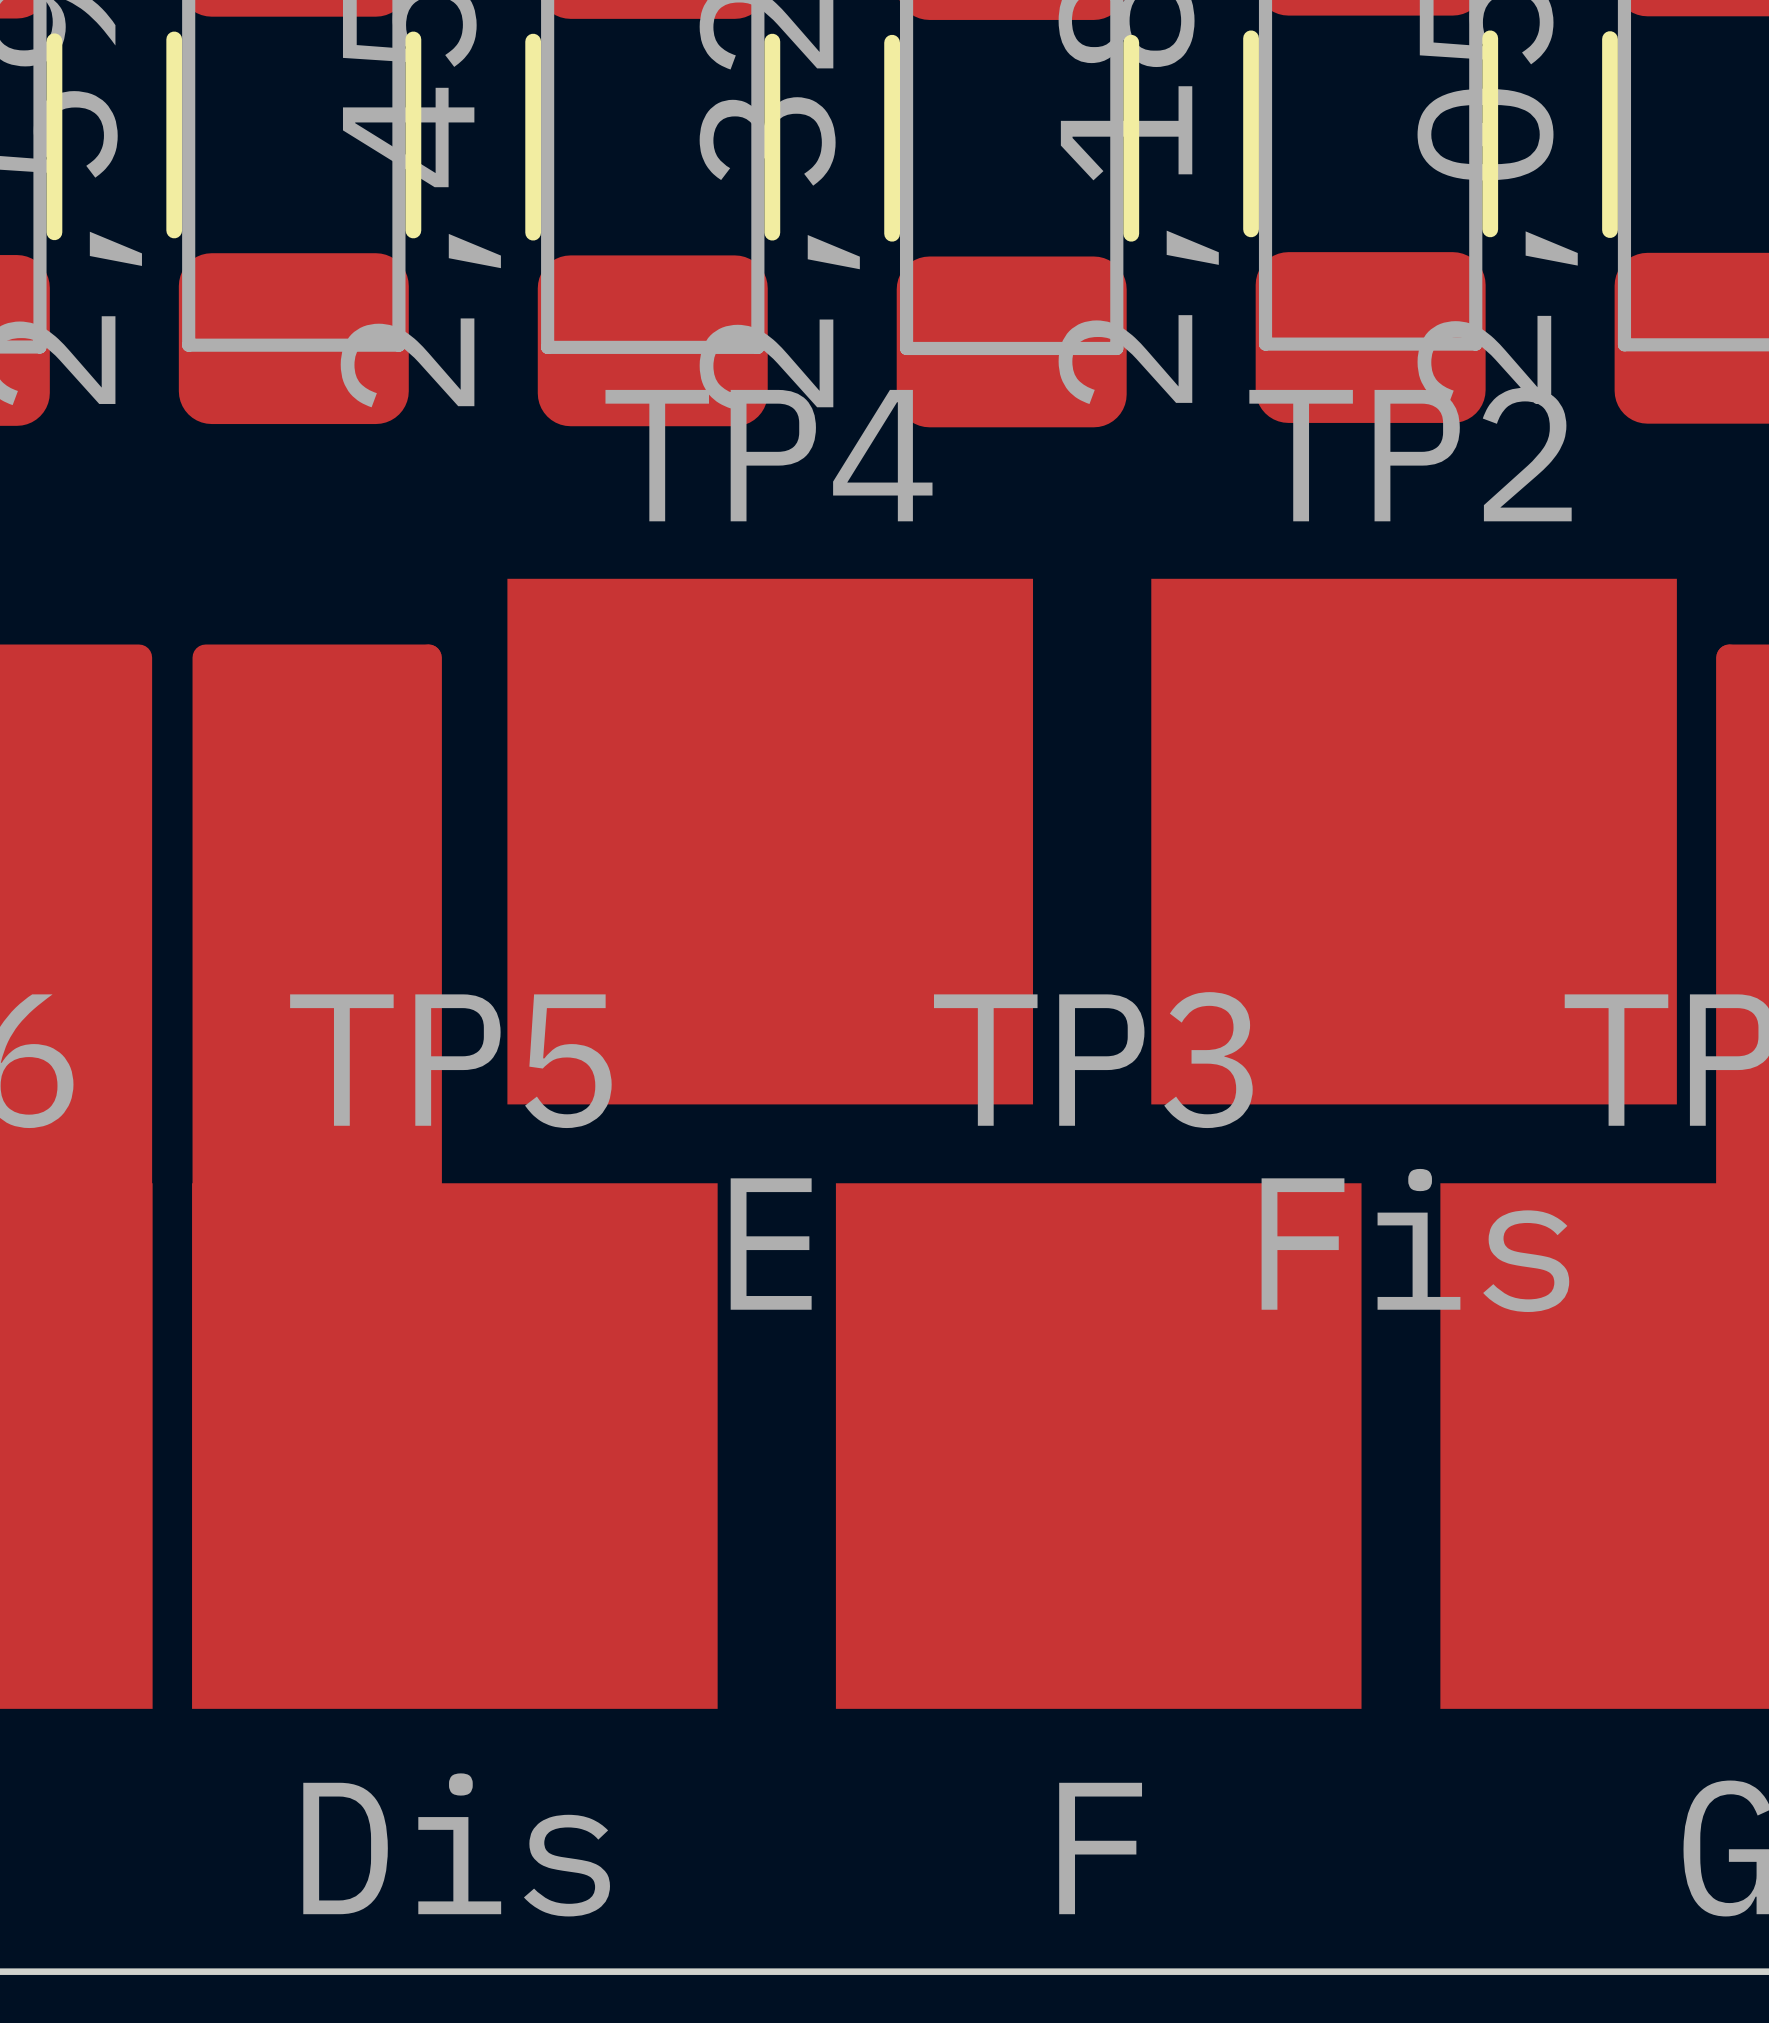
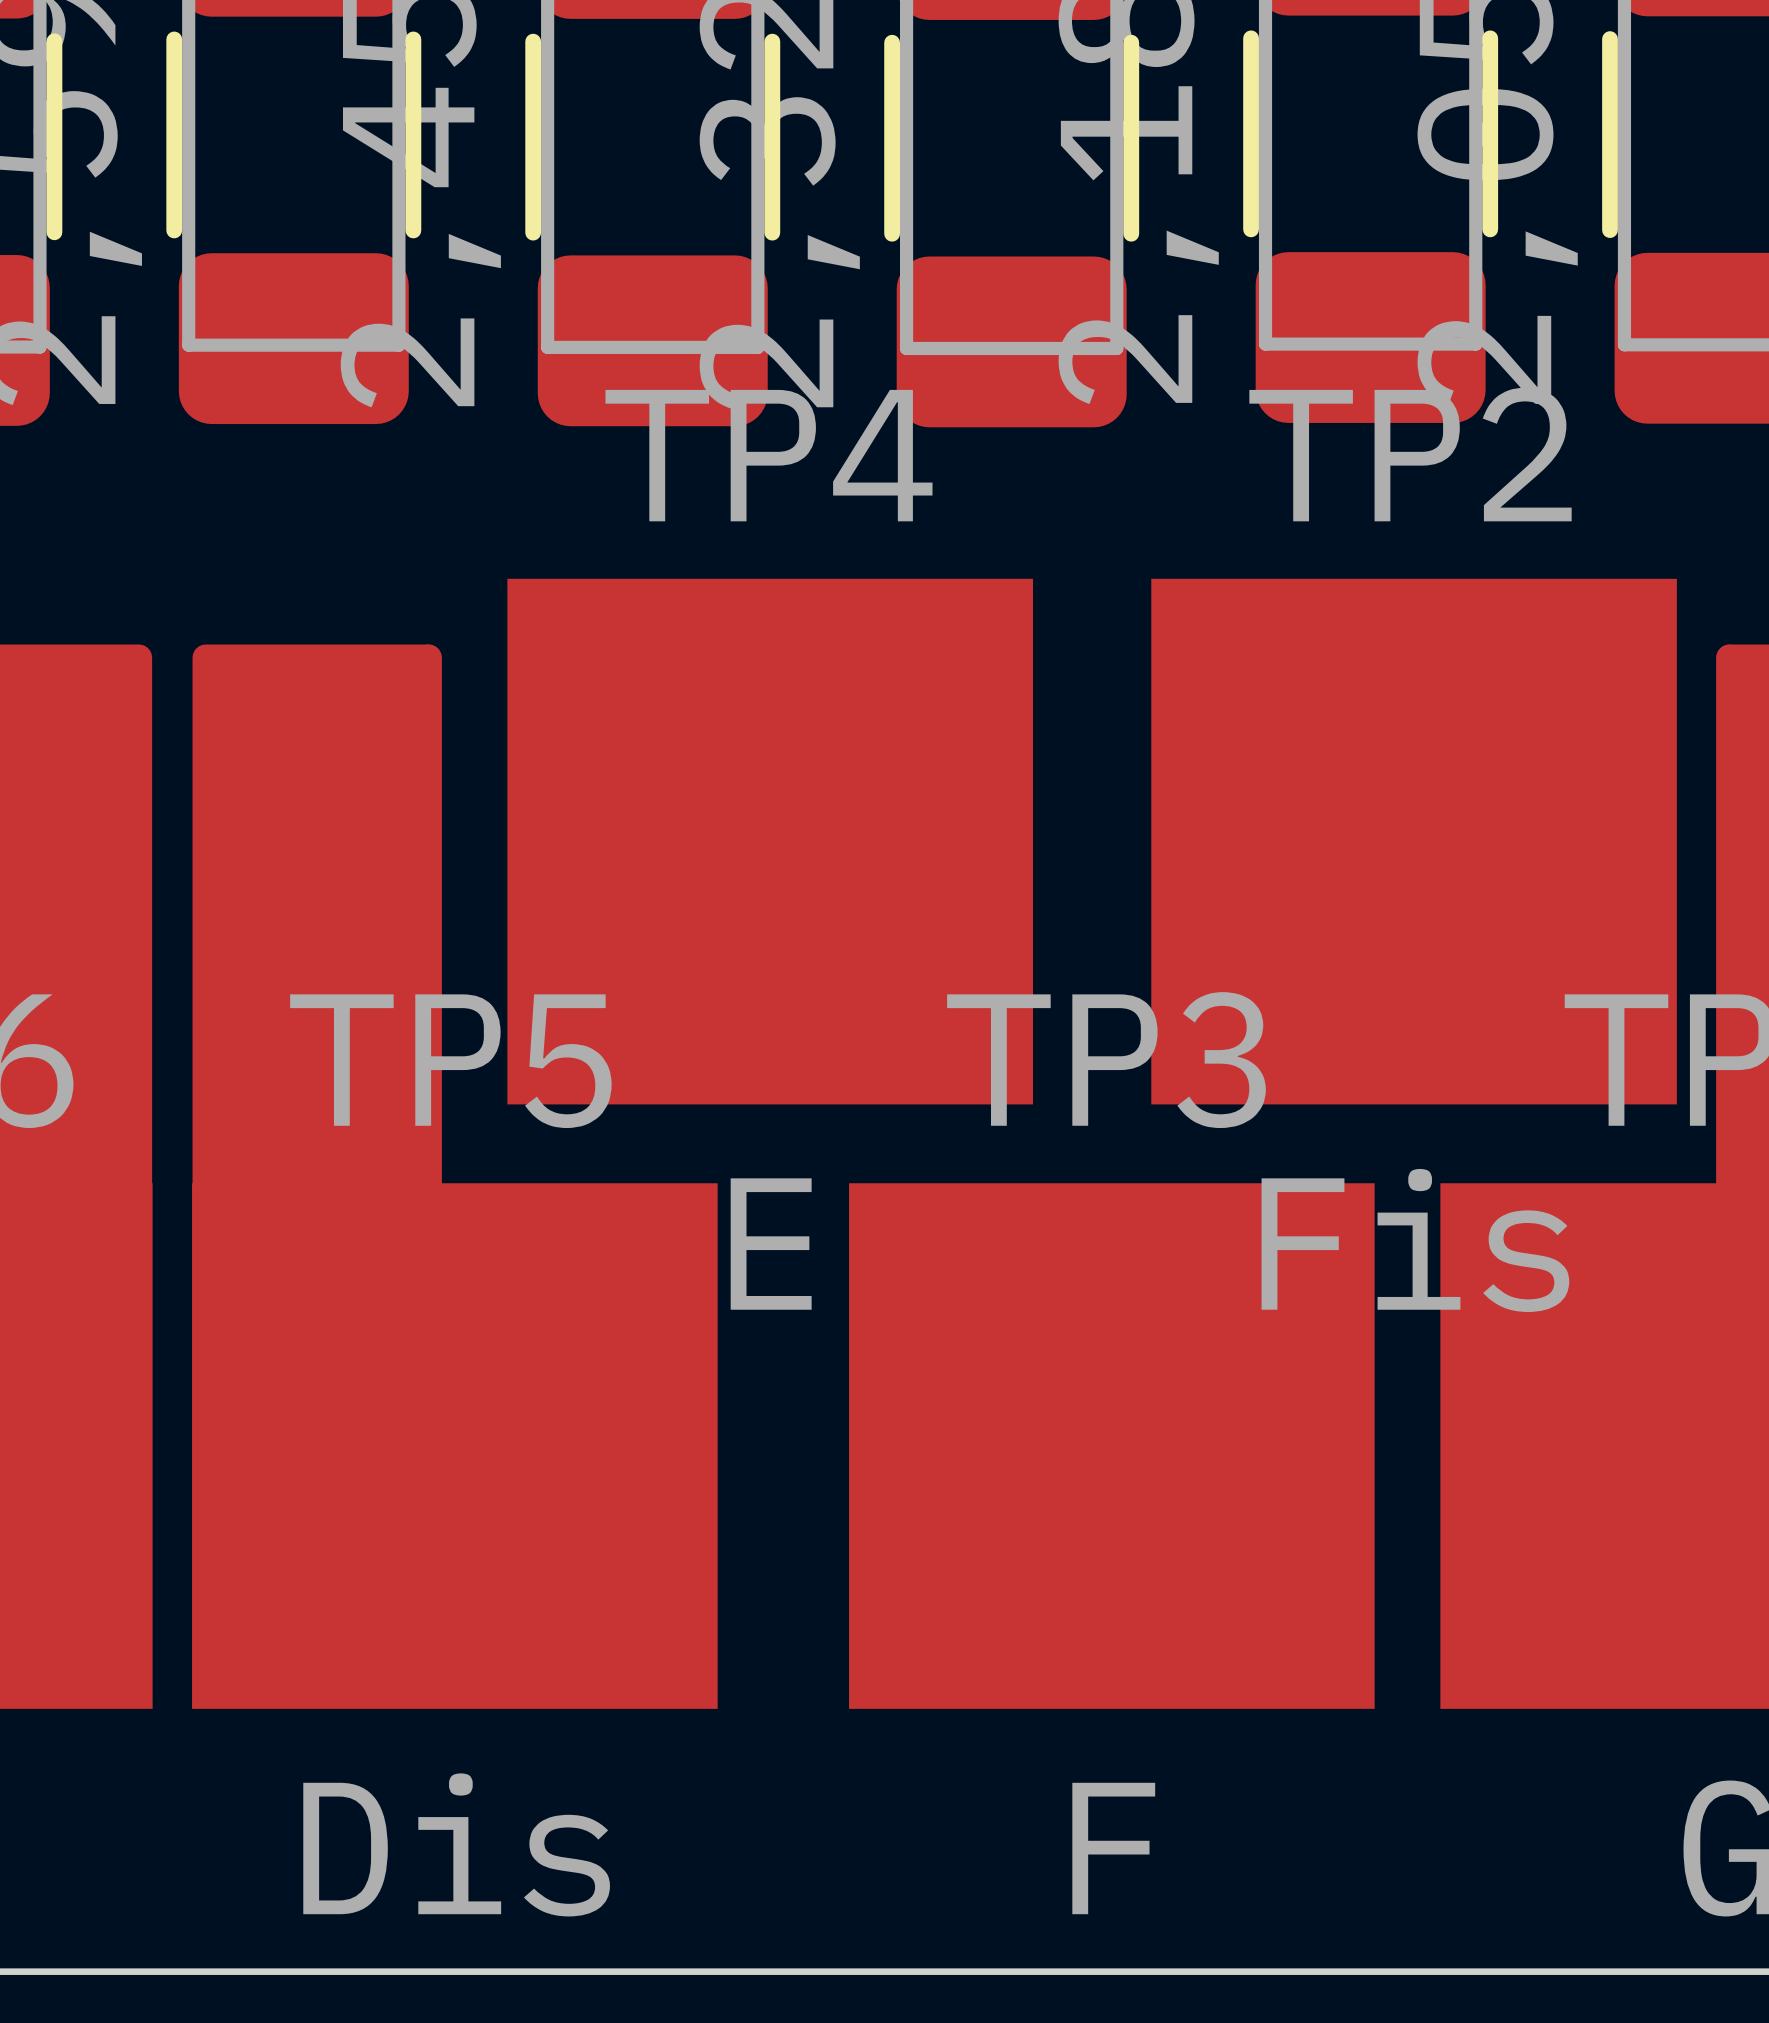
TP3 position: (1098, 1446) -> (1111, 1446)

